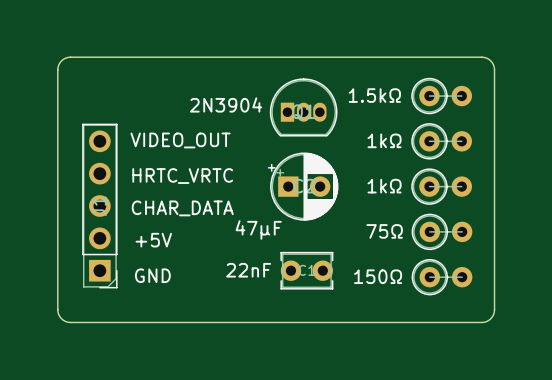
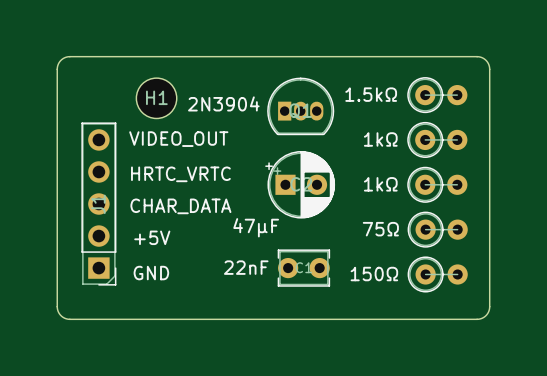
H1: none -> (156, 98)

